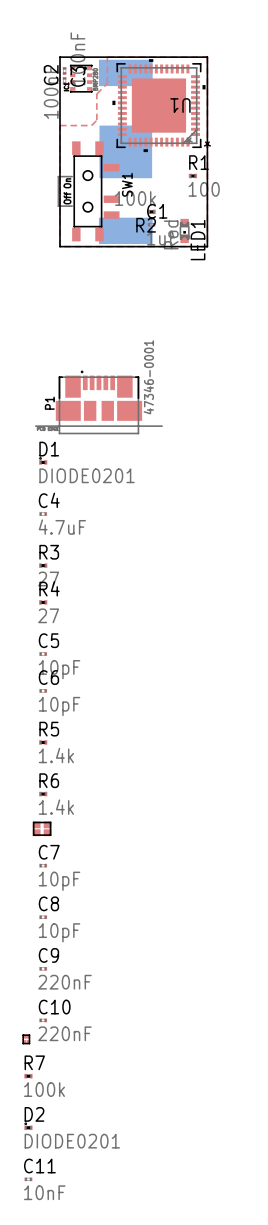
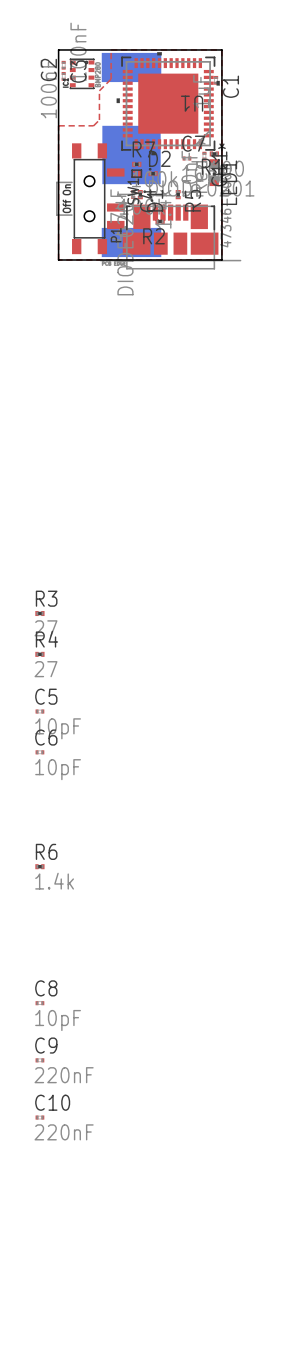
part: none -> (136, 173)
R1 position: (192, 175) -> (214, 153)
C1 rotation: 0° (151, 224) -> 90° clockwise (216, 80)
C1 position: (151, 224) -> (216, 80)
LED1 position: (184, 230) -> (214, 172)
P1 position: (98, 402) -> (170, 234)
D1 rotation: 0° (43, 460) -> 90° clockwise (141, 194)
D1 position: (43, 460) -> (141, 194)
C4 rotation: 0° (43, 514) -> 90° clockwise (133, 194)
C4 position: (43, 514) -> (133, 194)
R5 rotation: 0° (43, 742) -> 90° clockwise (178, 194)
R5 position: (43, 742) -> (178, 194)
part: (42, 828) -> none
C7 position: (43, 865) -> (186, 158)
part: (26, 1039) -> none
R7 position: (28, 1076) -> (136, 164)
D2 position: (28, 1126) -> (153, 172)
C11 rotation: 0° (28, 1179) -> 90° clockwise (204, 156)
C11 position: (28, 1179) -> (204, 156)

